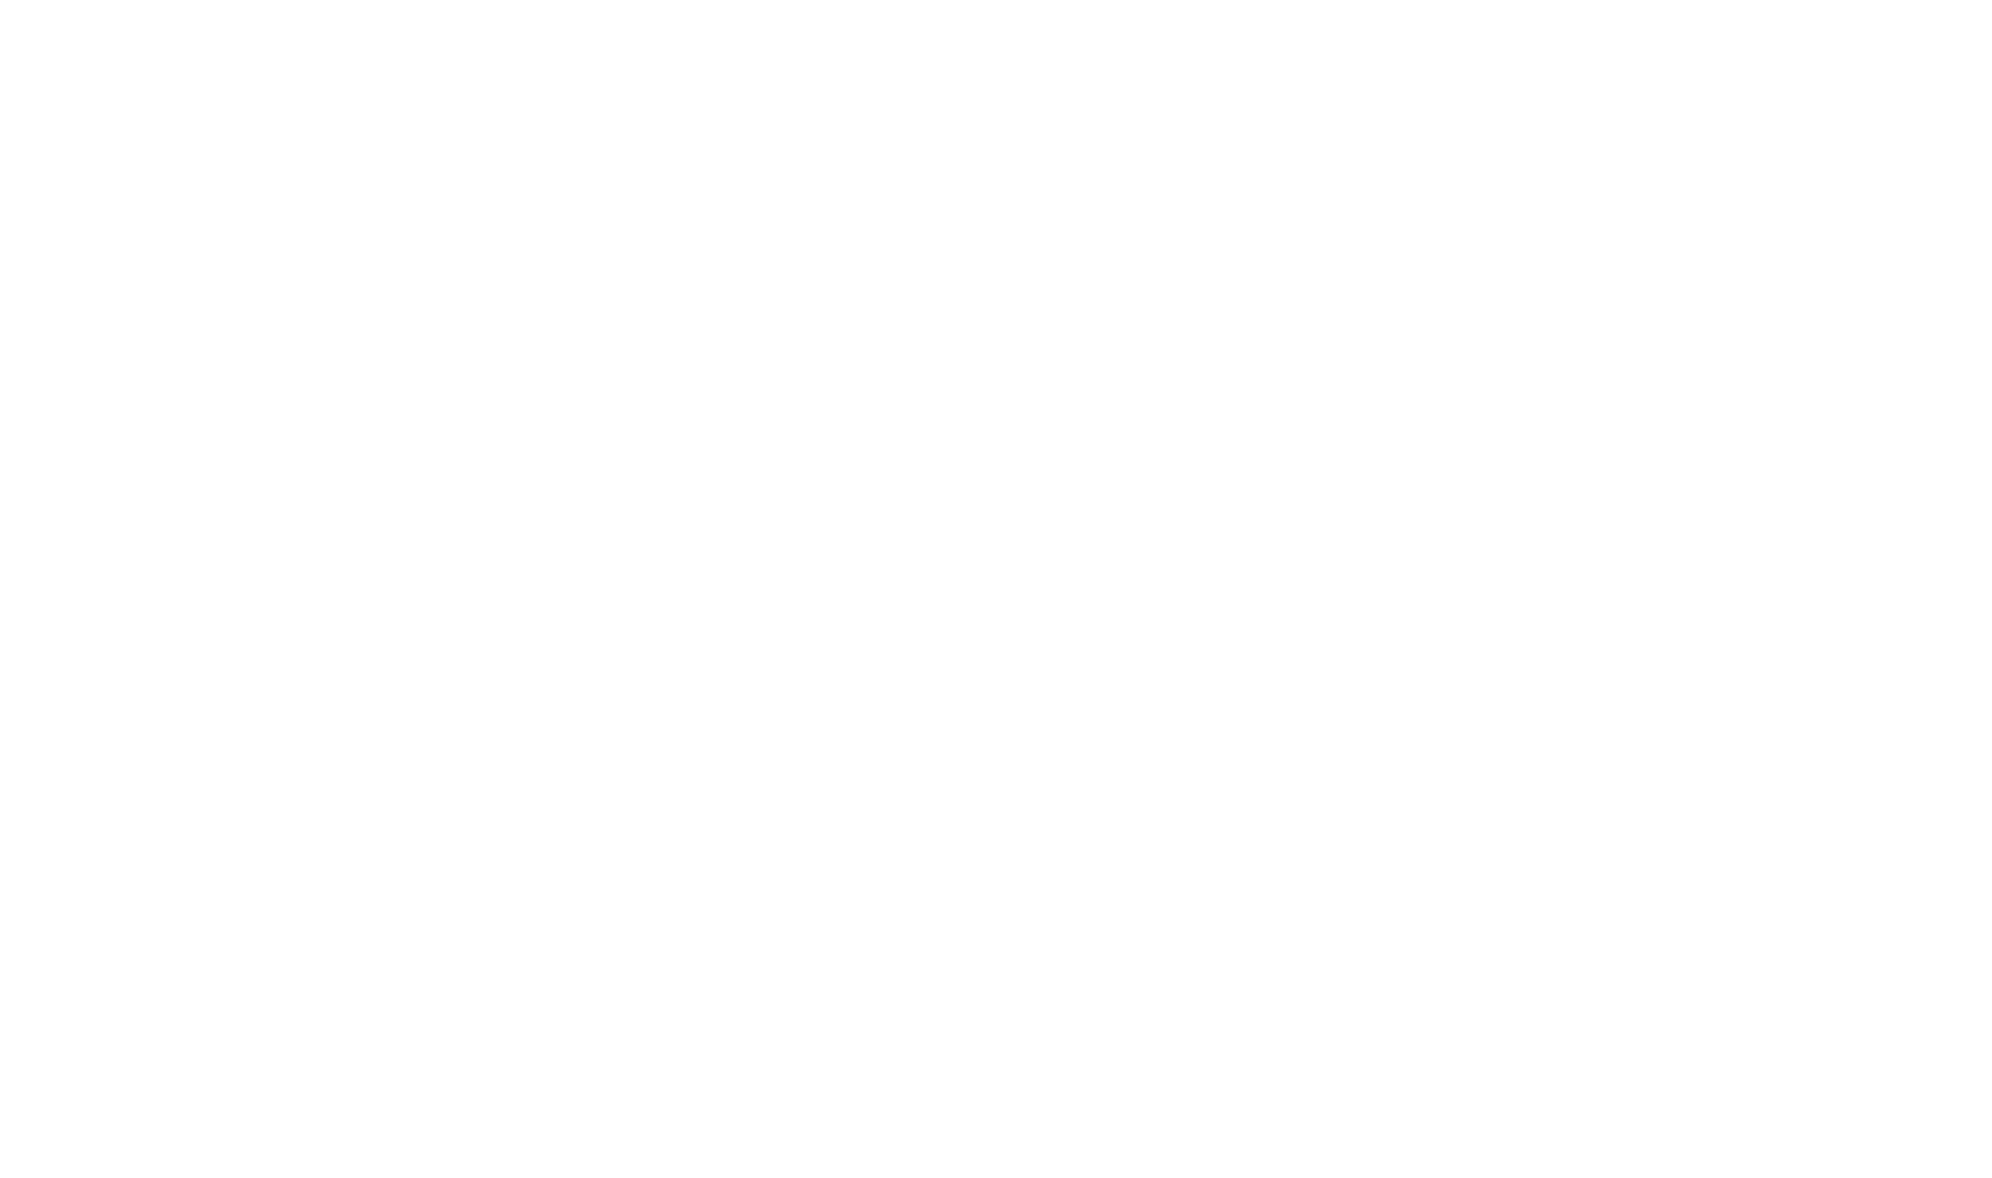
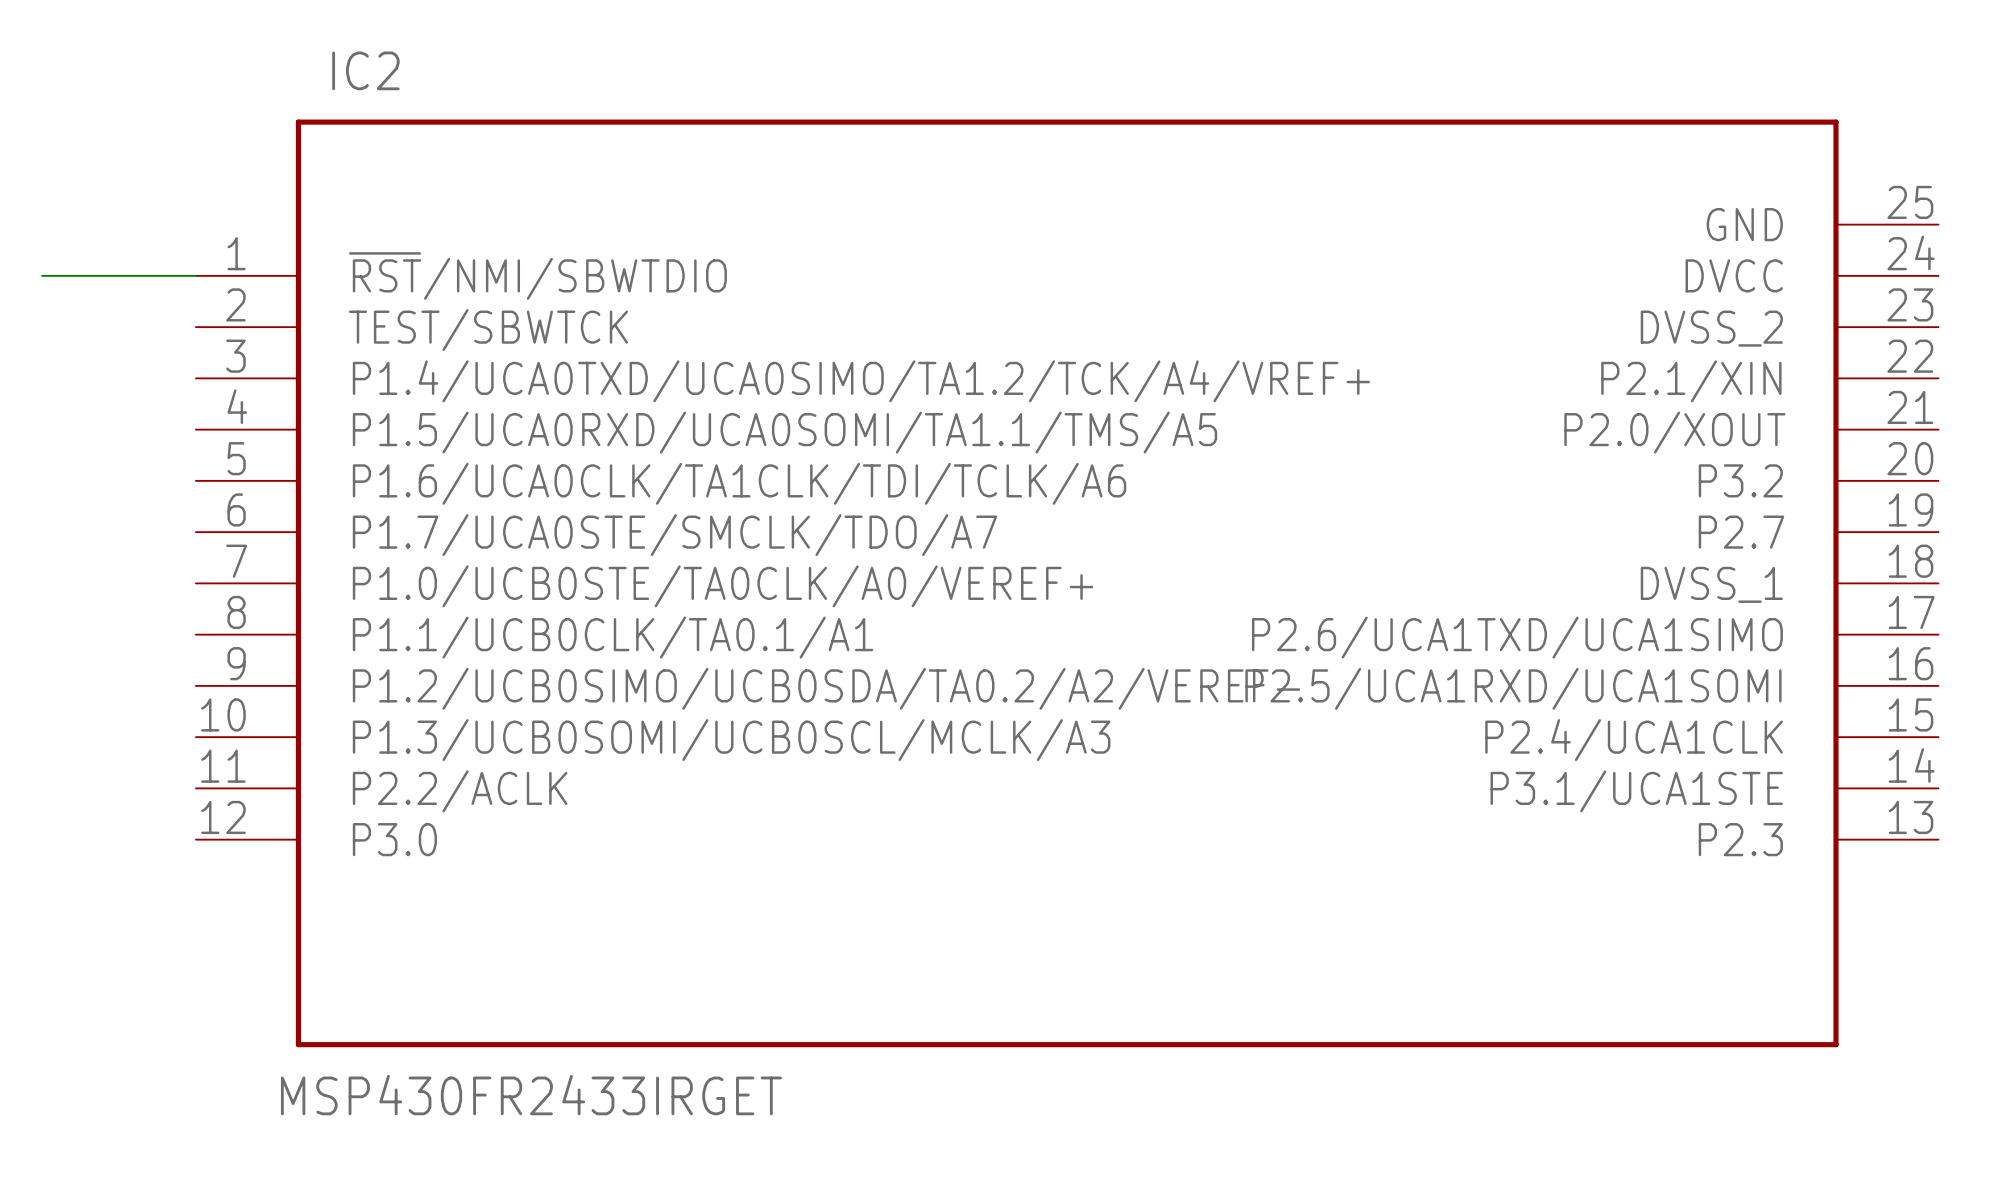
wire: none -> (42, 275) (195, 275)
IC2: none -> MSP430FR2433IRGET (1067, 583)

